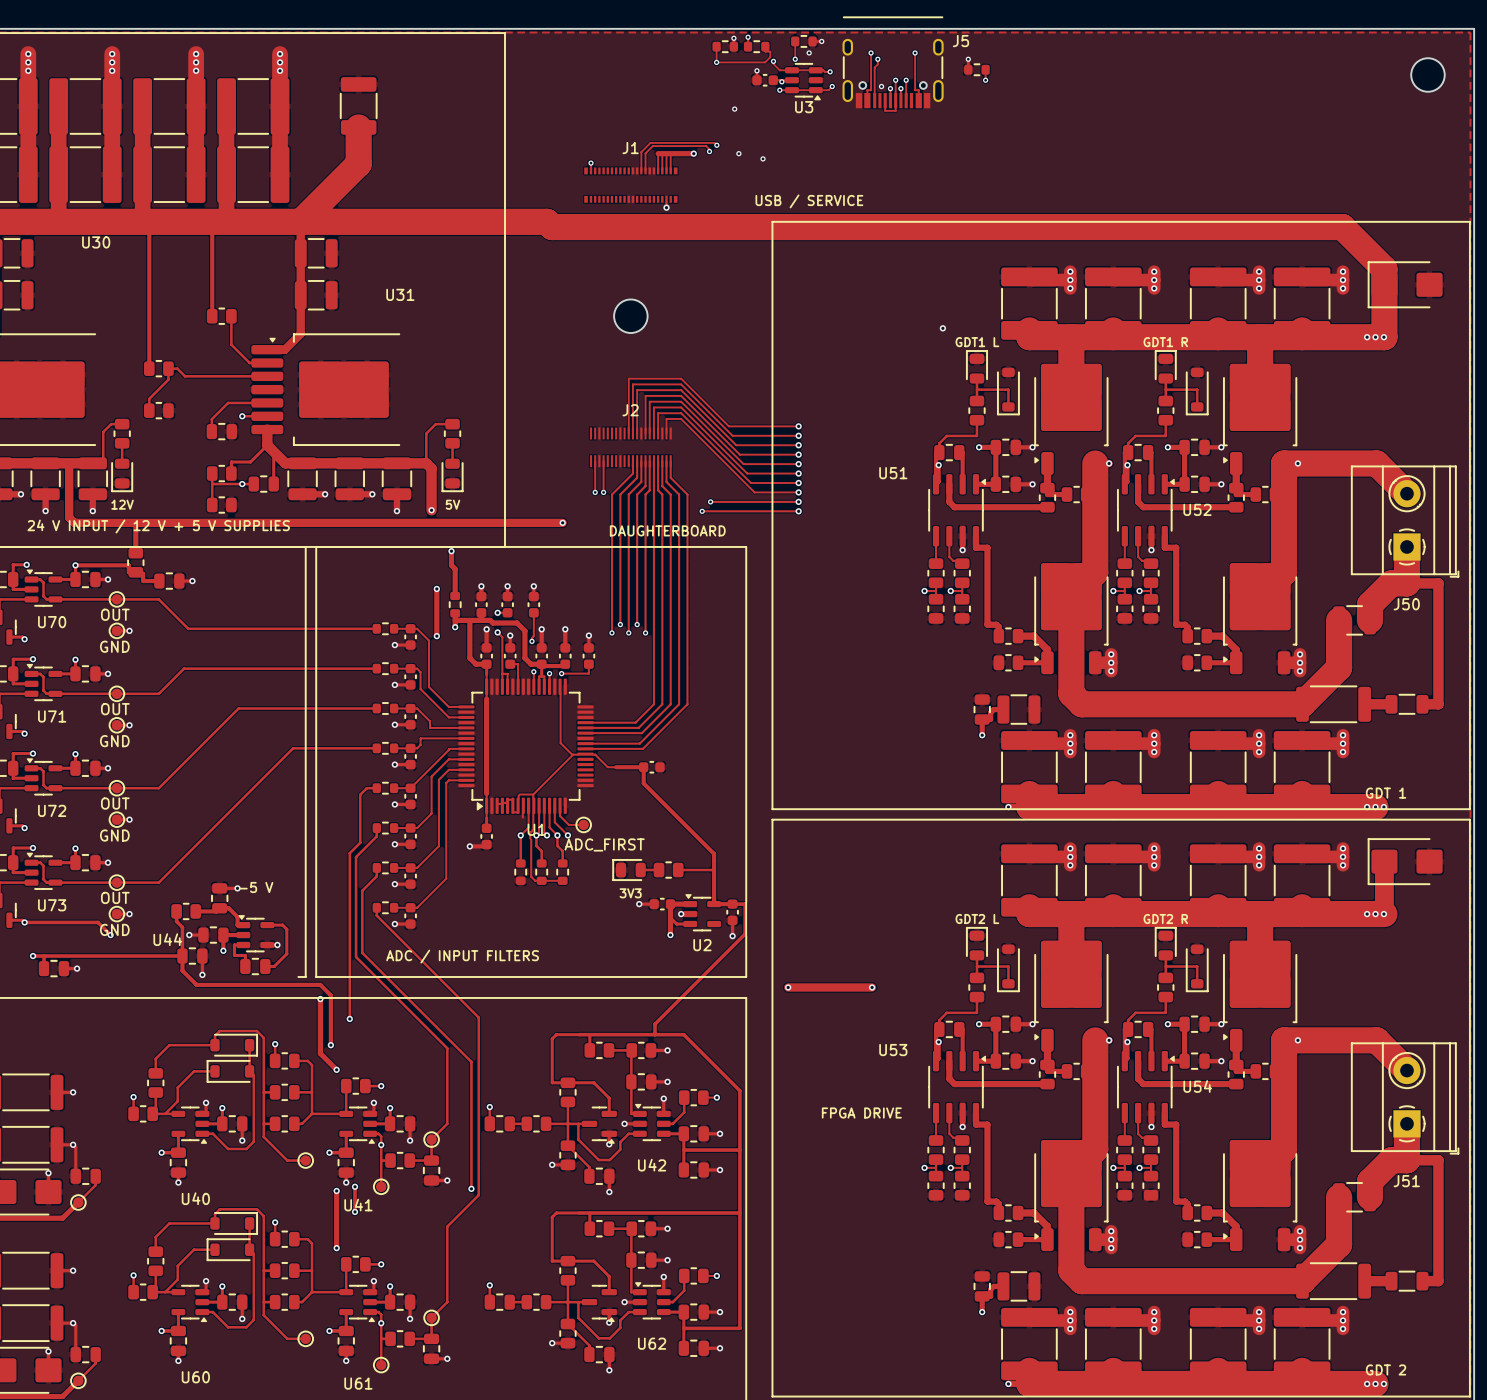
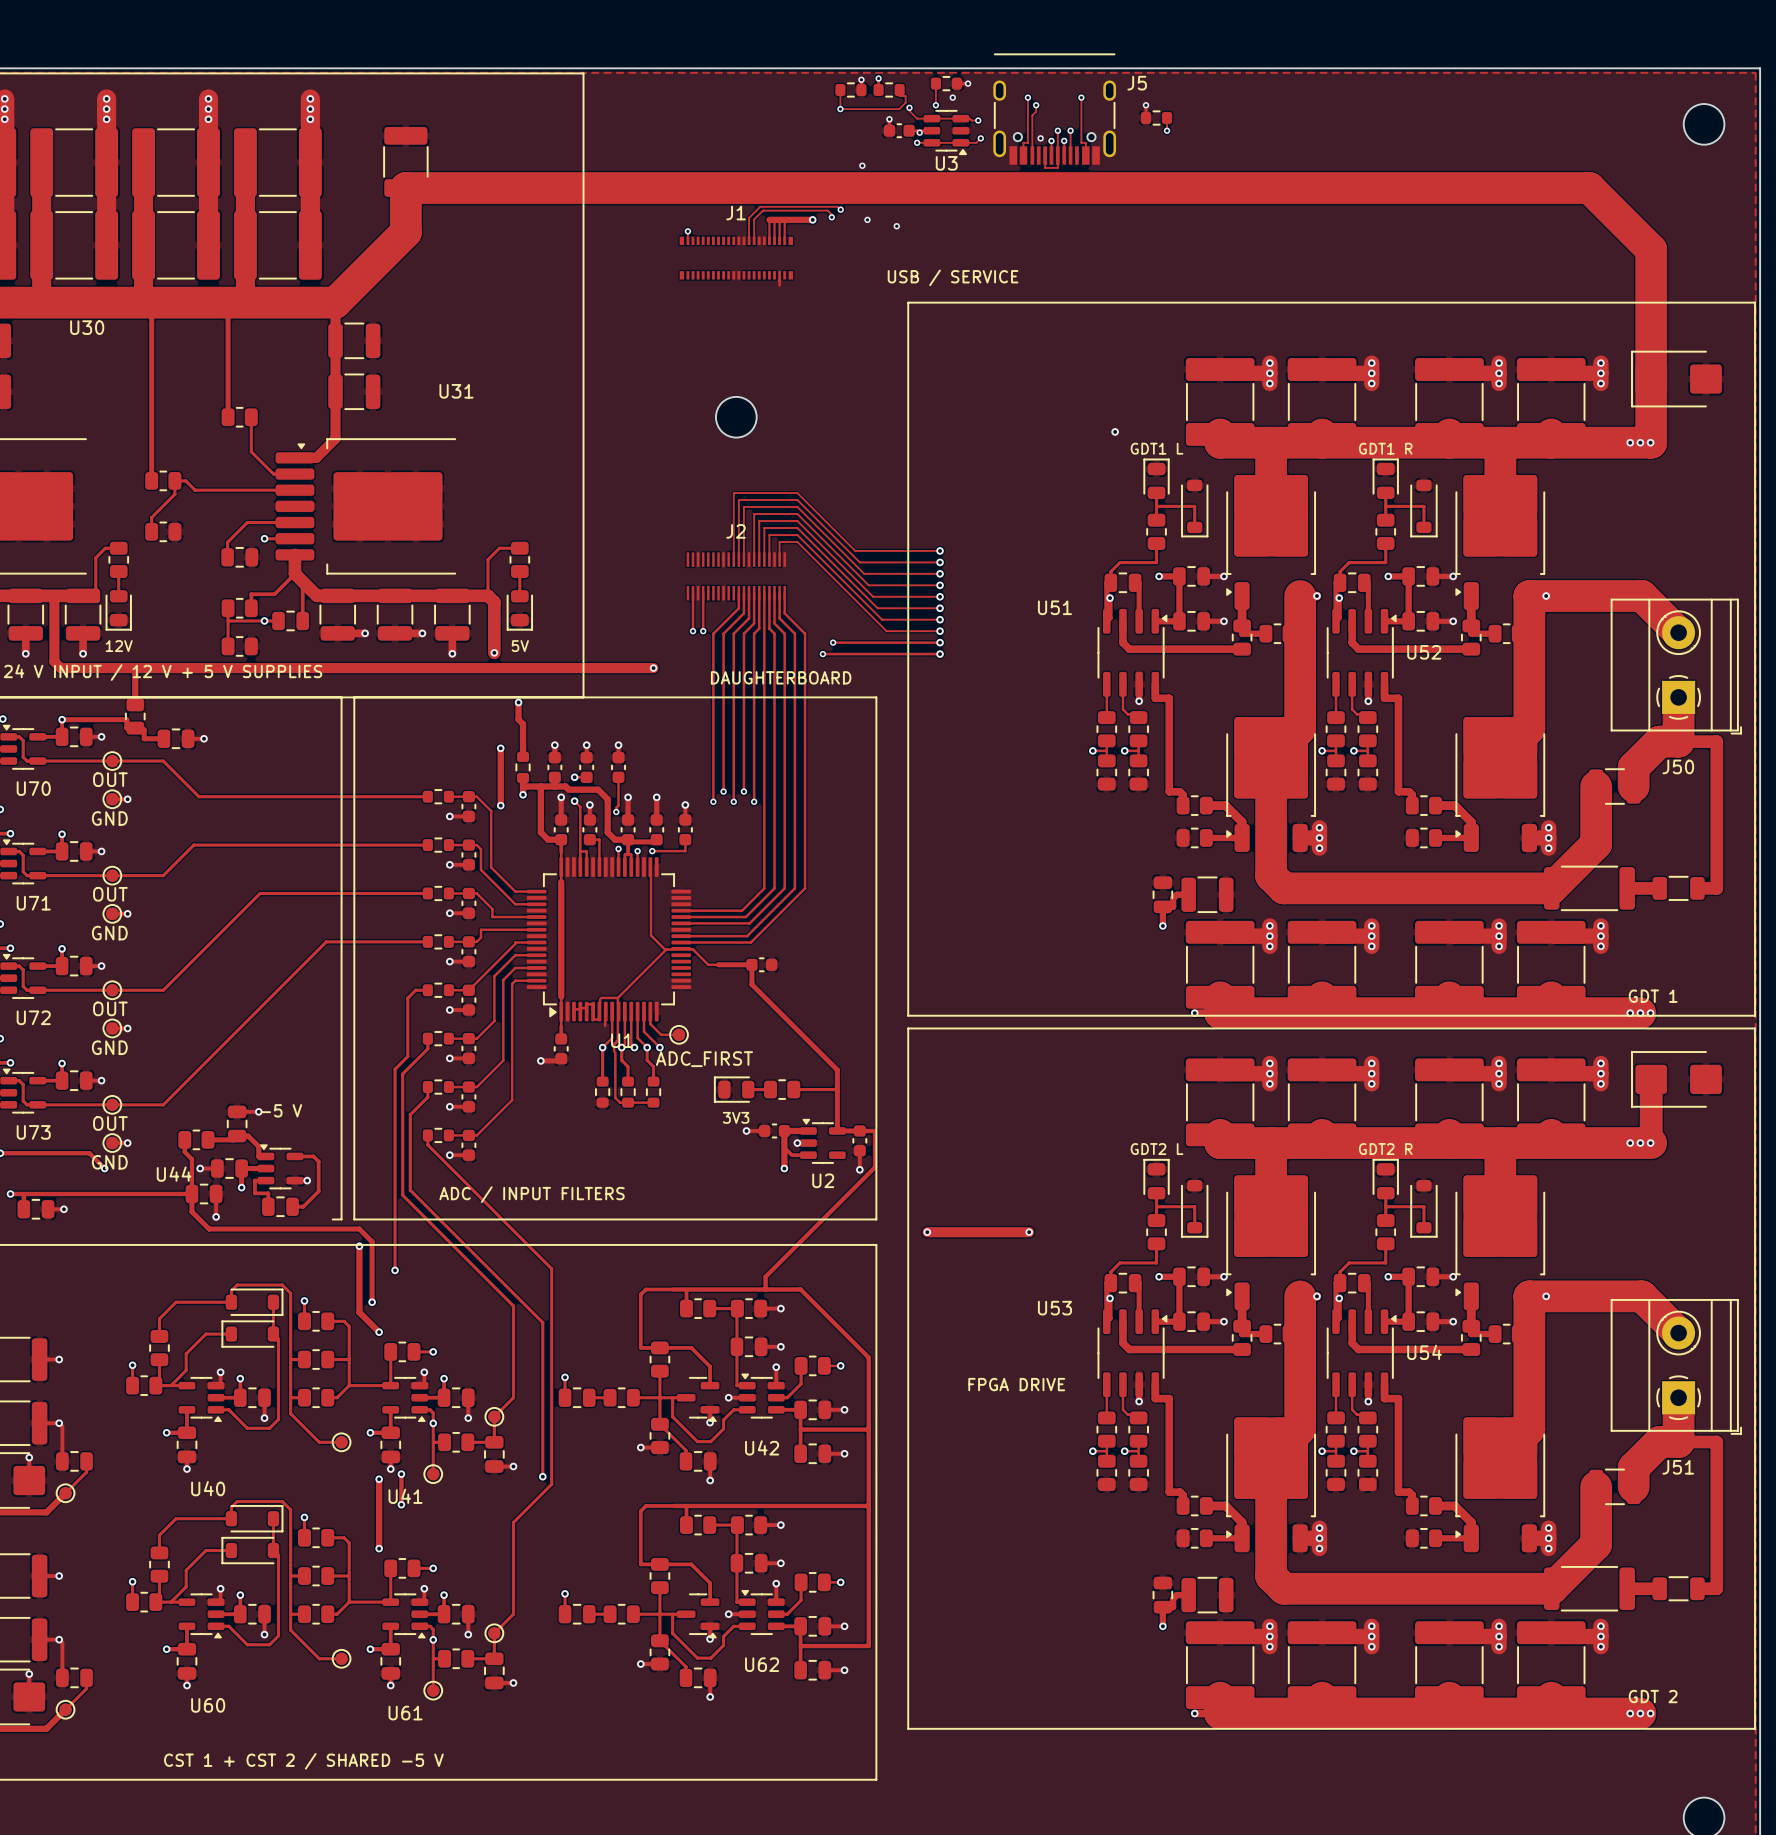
via: (666, 207) -> none
track: (300, 221) (546, 221) (552, 227) (1342, 227) (1384, 269) -> (405, 188) (1589, 188) (1651, 249) (1651, 359)

